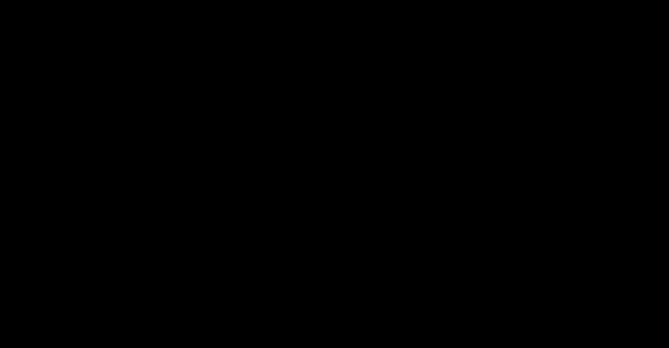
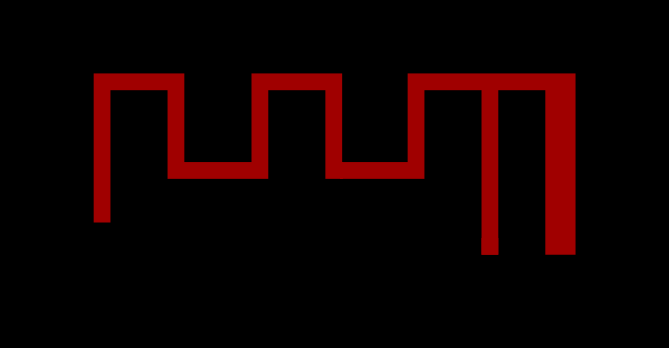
part: none -> (334, 164)

